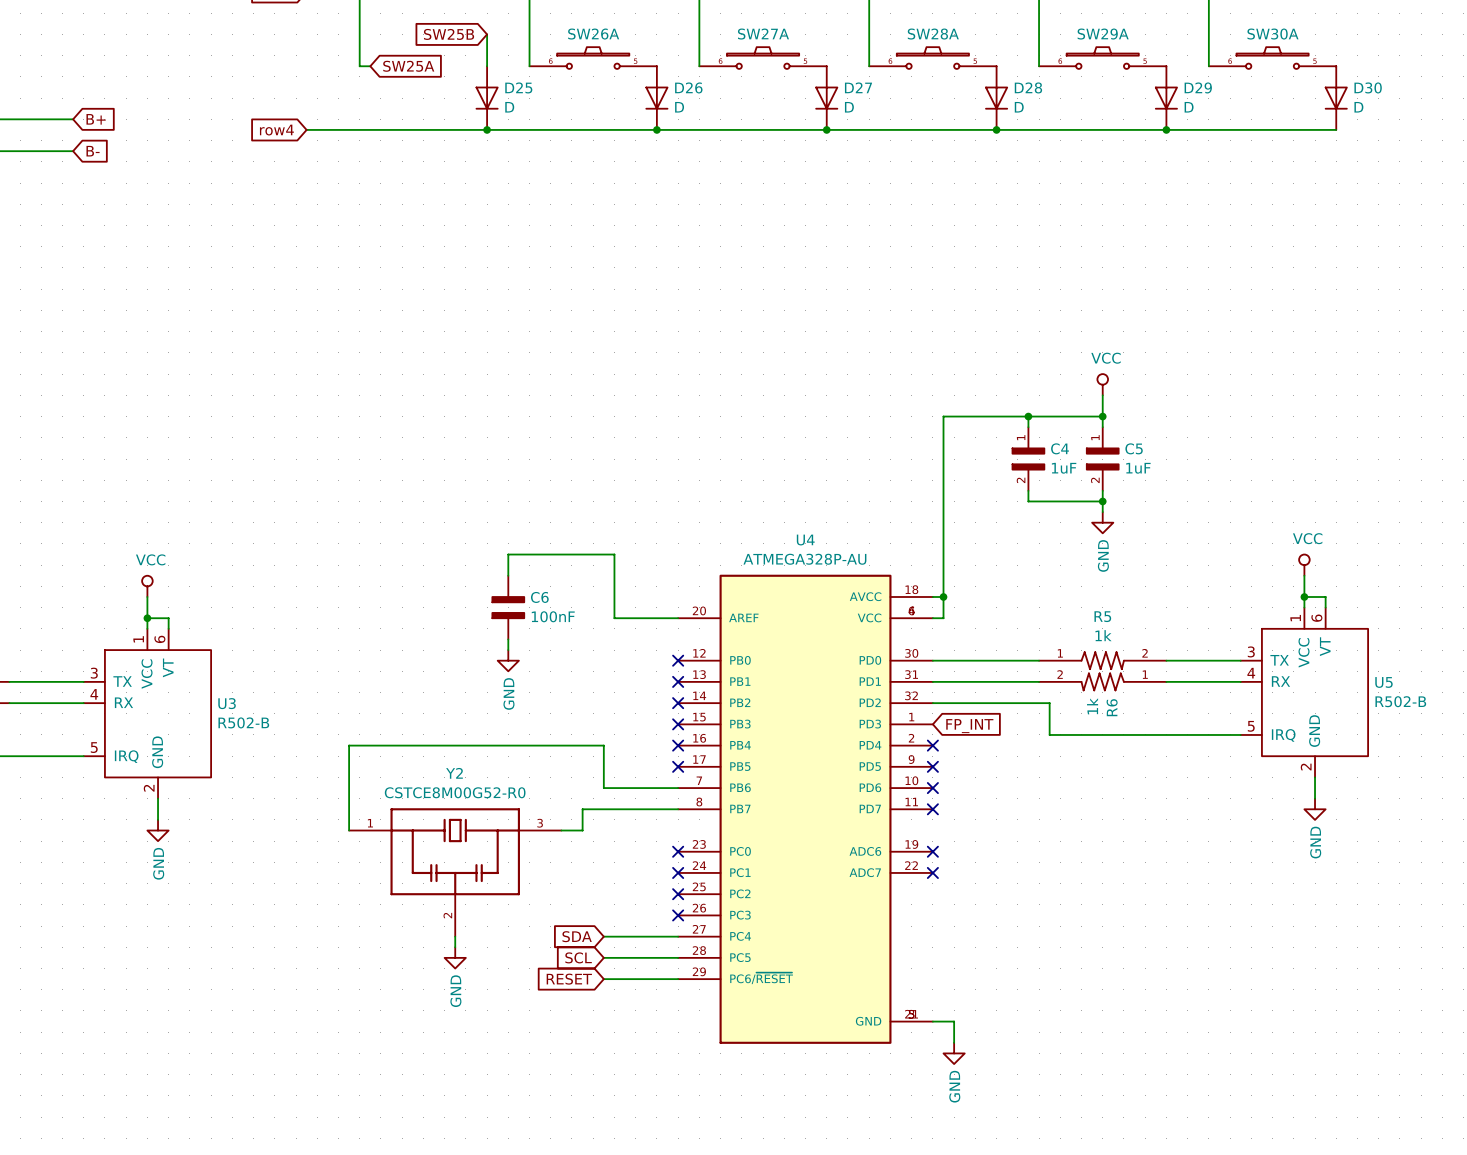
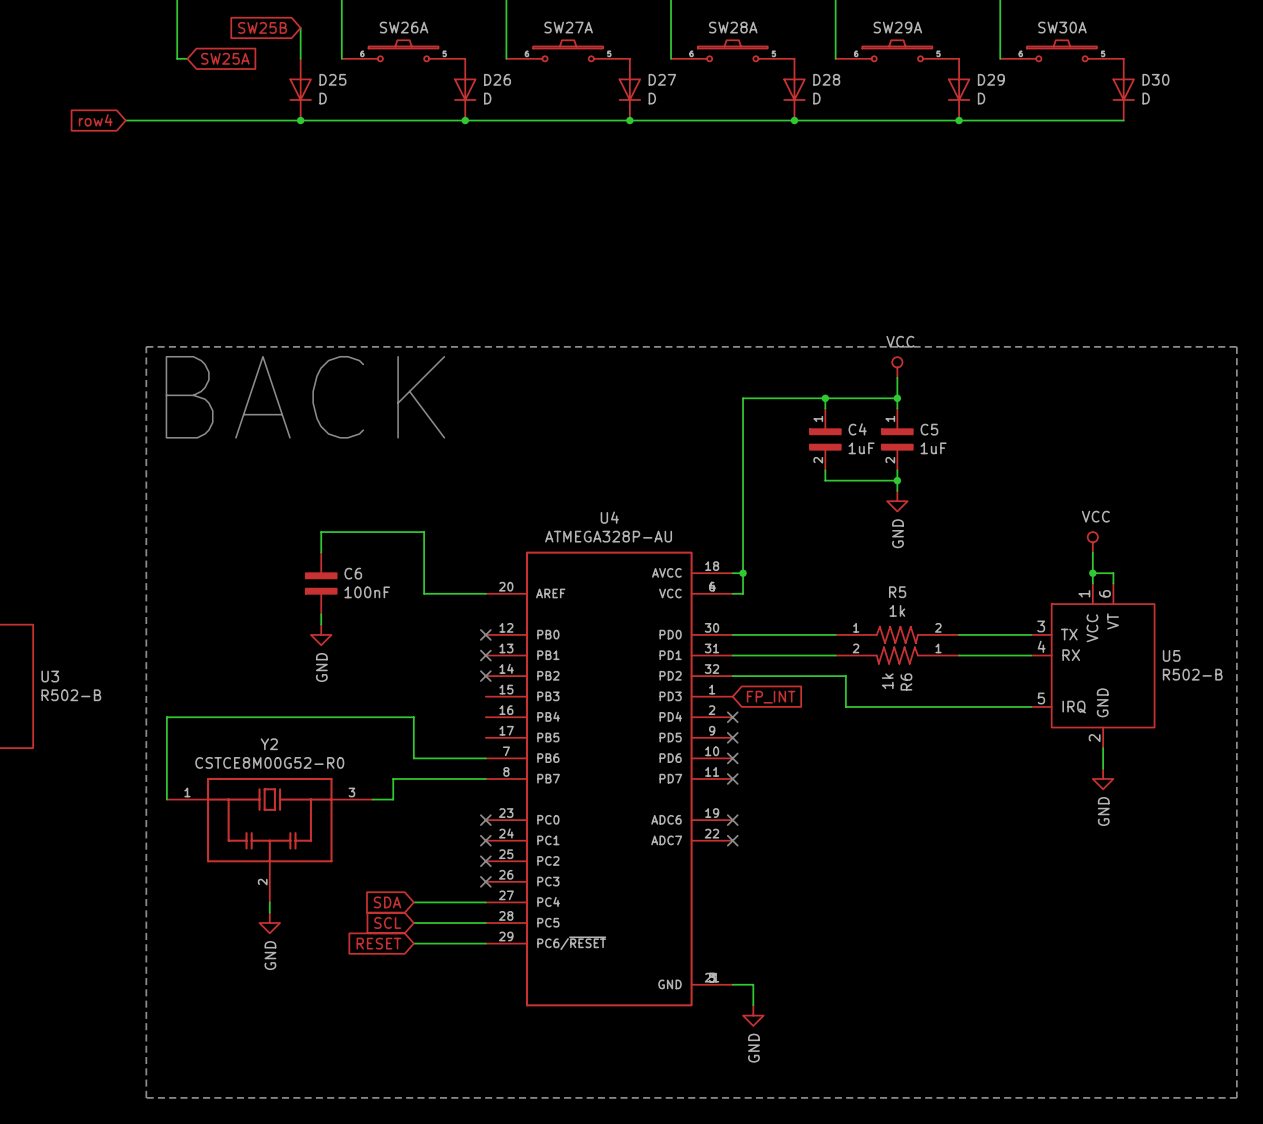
line: none -> (146, 346) (1236, 346) (1236, 1097) (146, 1097) (146, 346)
text: none -> BACK (305, 397)
no-connect mark: (678, 724) -> none
no-connect mark: (678, 745) -> none
no-connect mark: (678, 766) -> none

